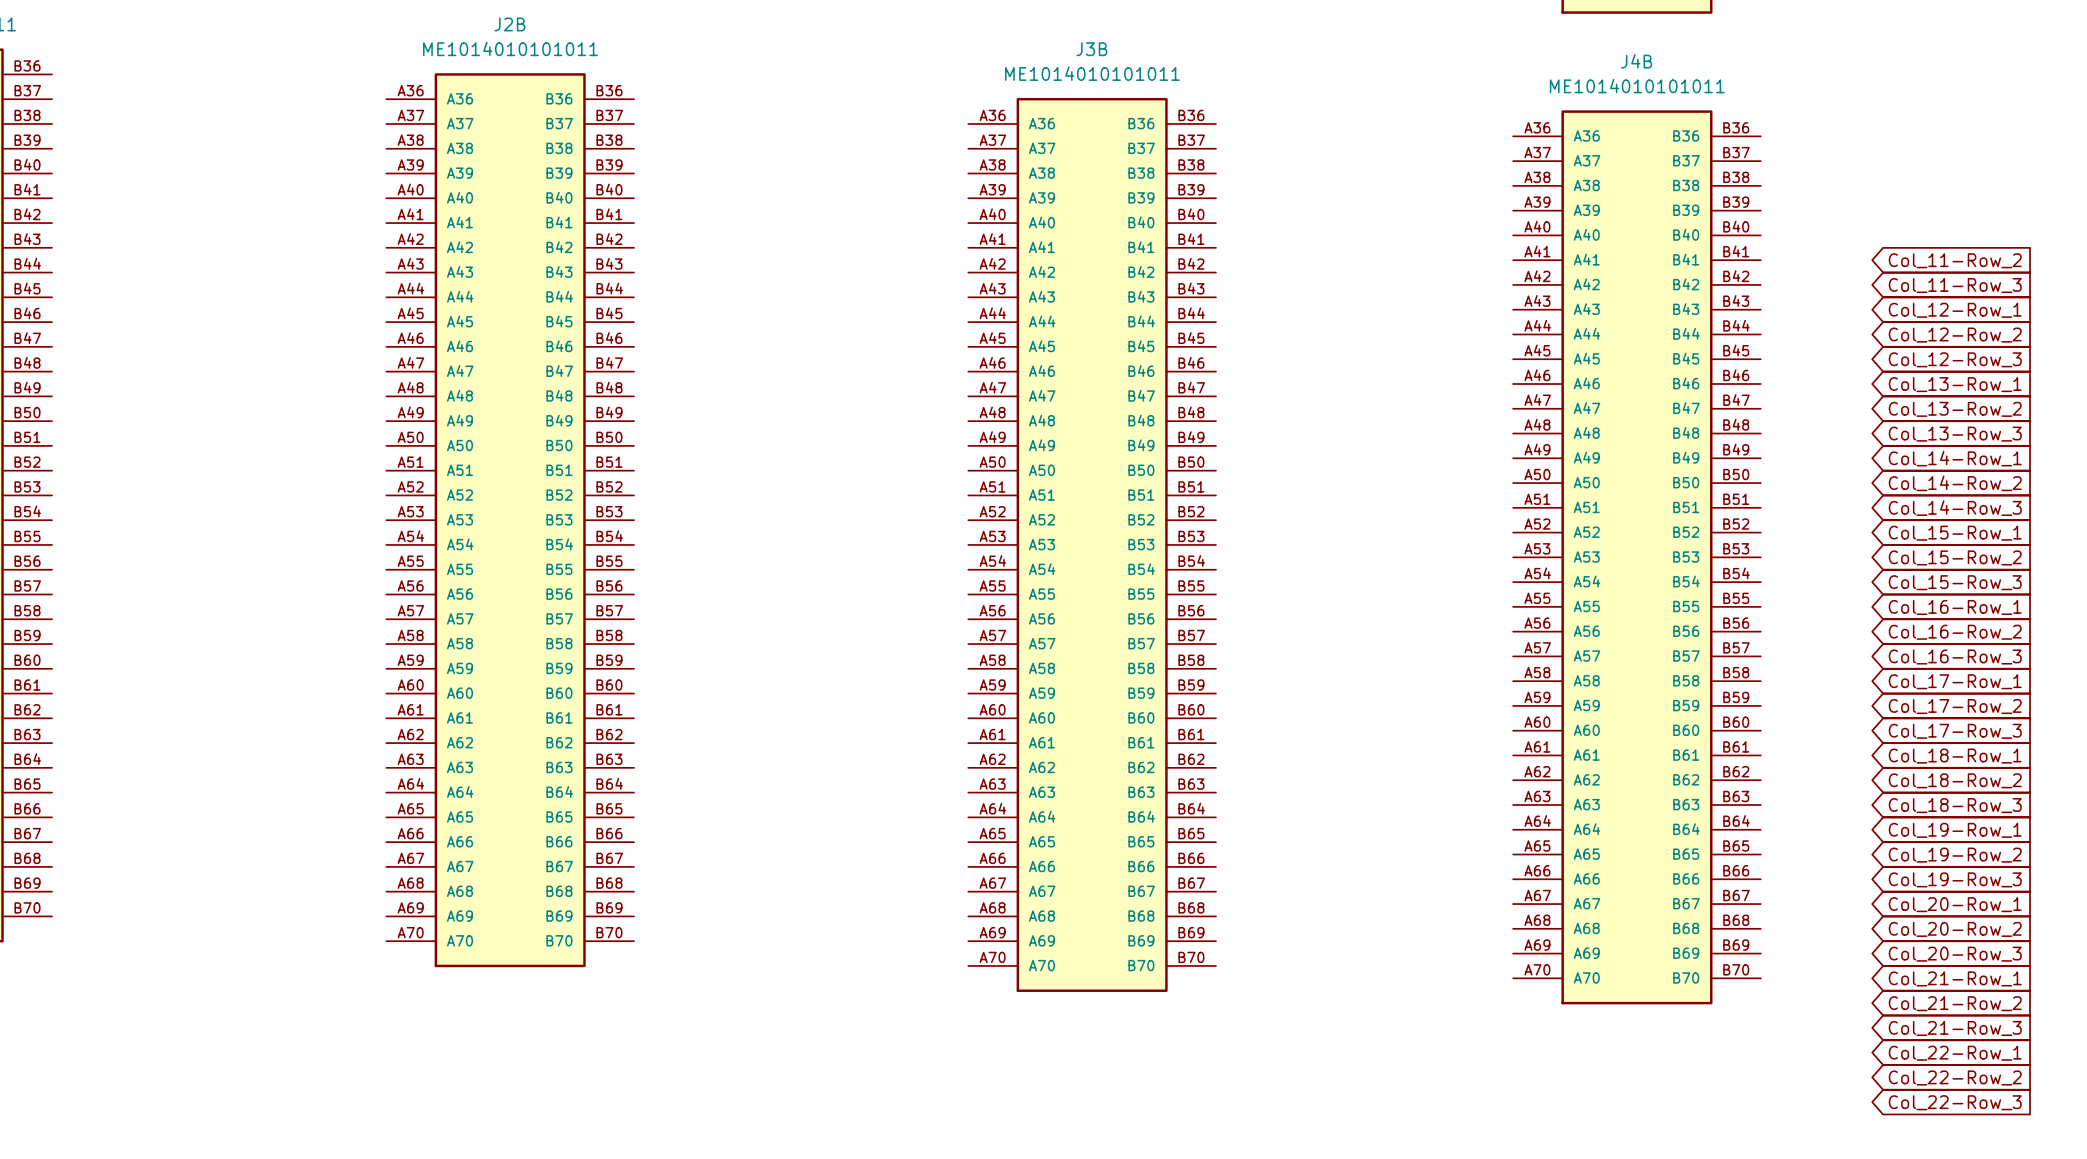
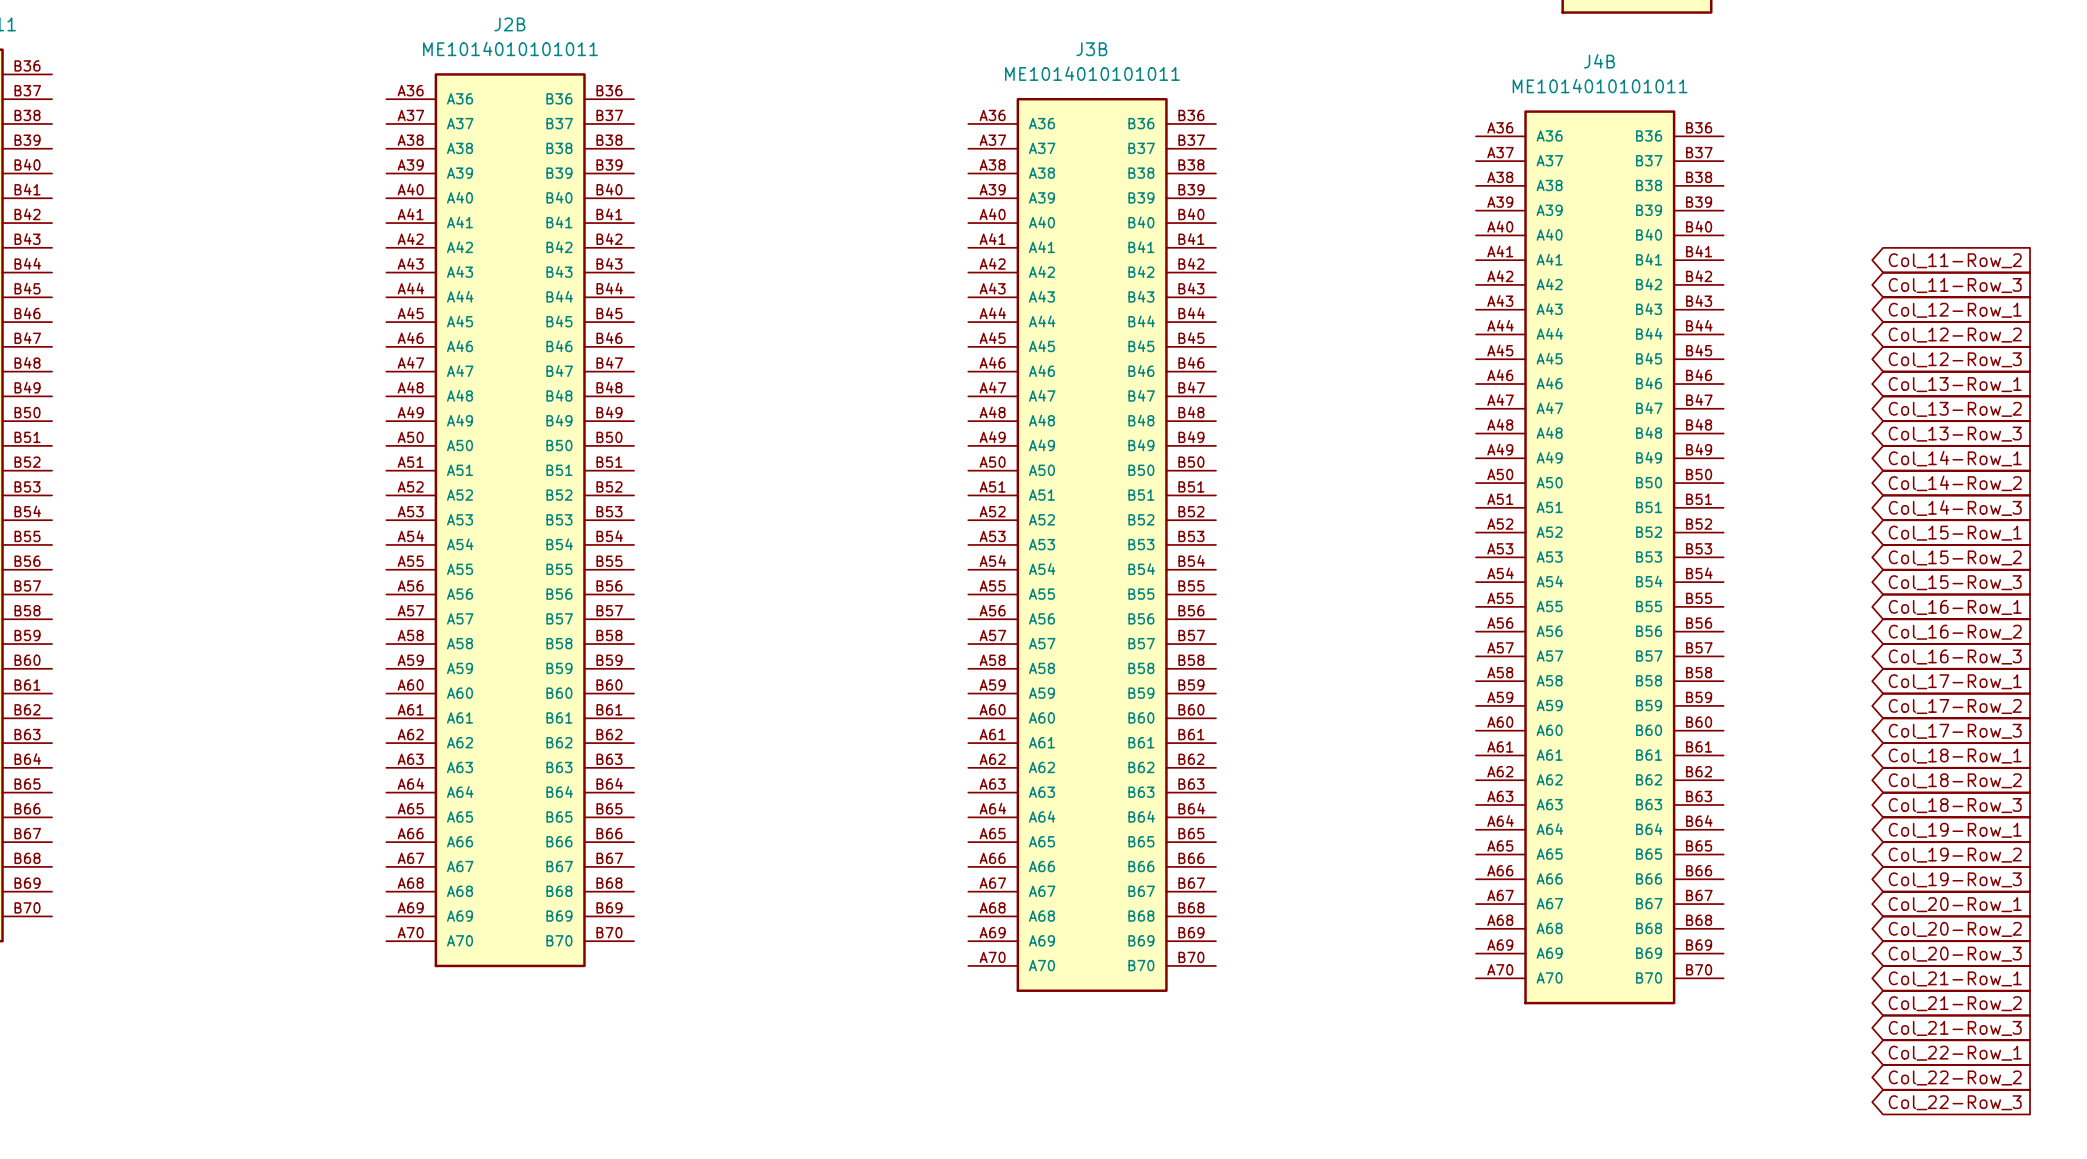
J4B position: (1636, 557) -> (1599, 557)

